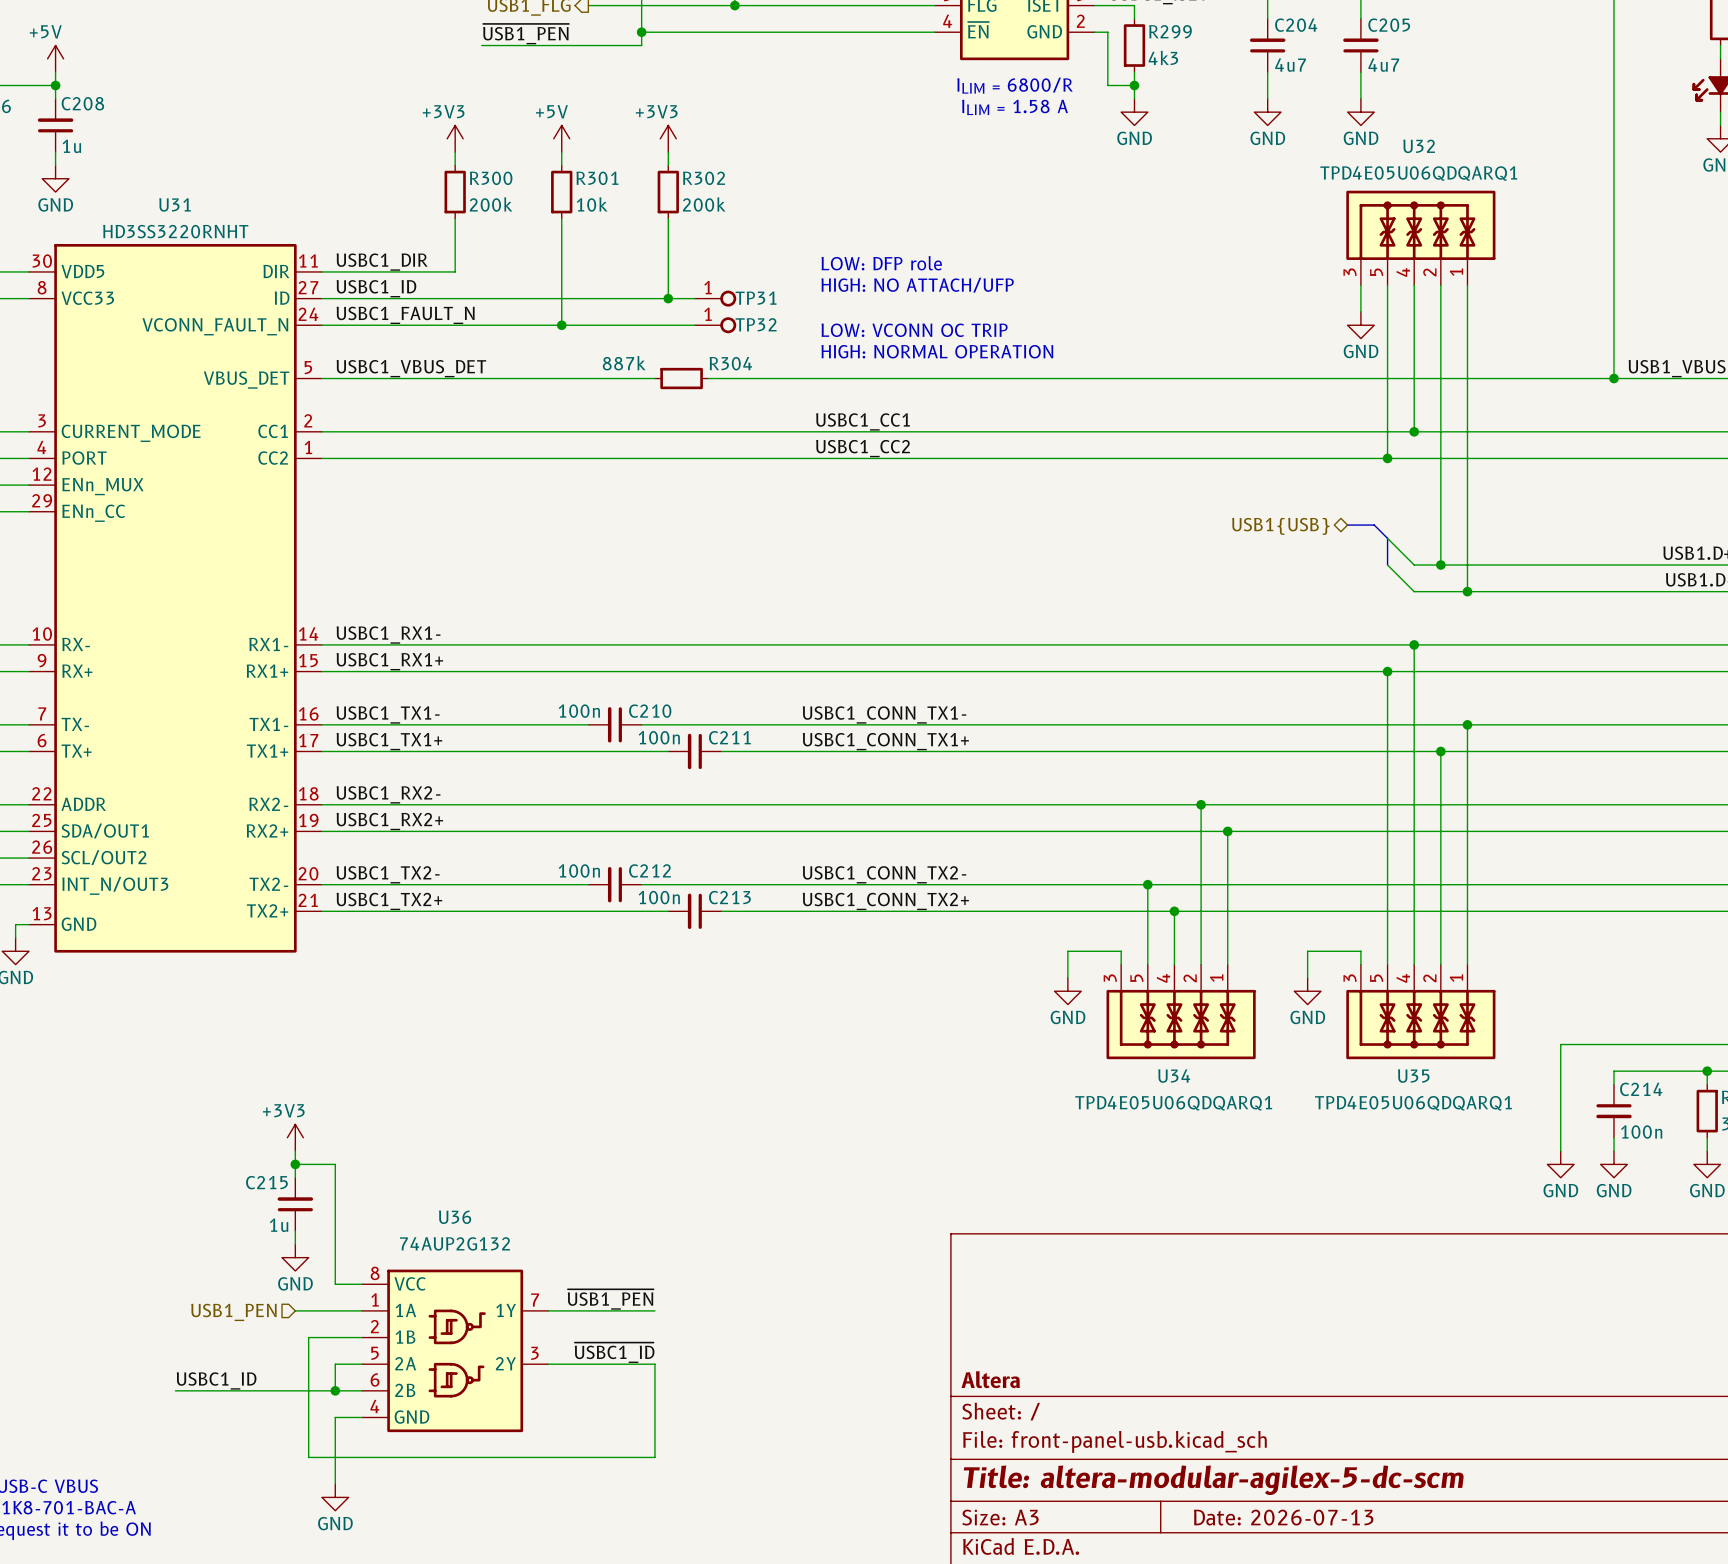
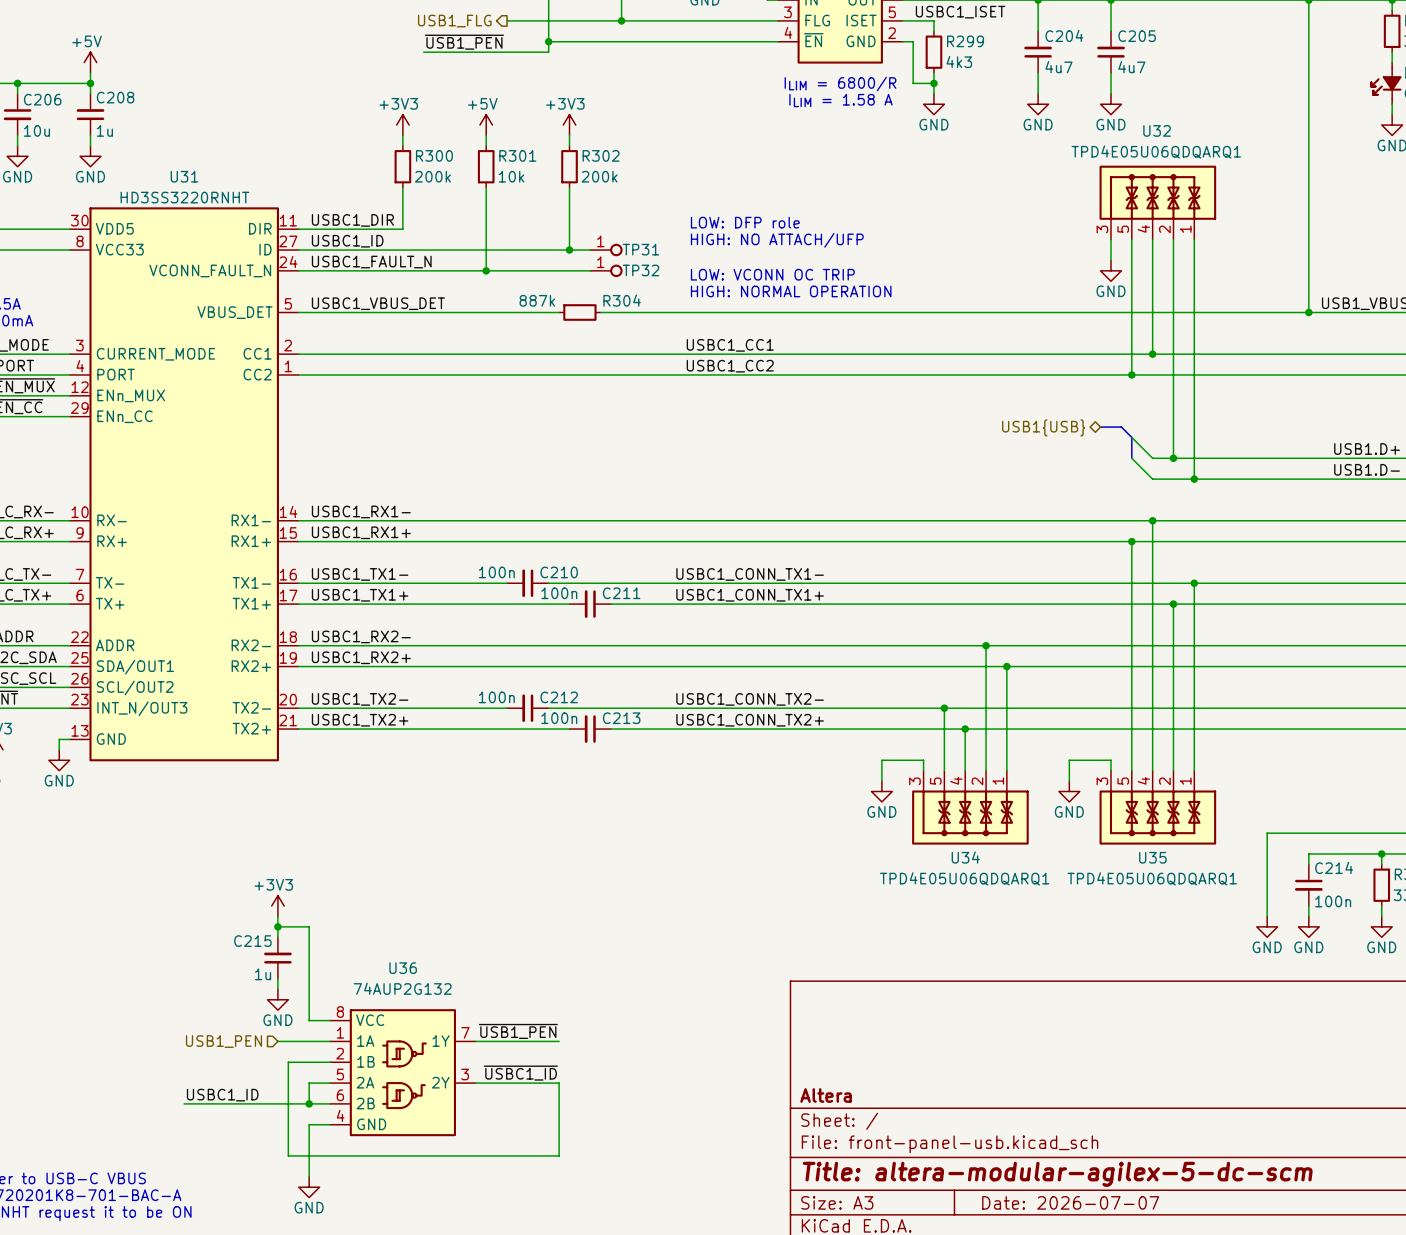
title block: Date: 2026-07-13 (1283, 1517) -> Date: 2026-07-07 (1070, 1202)

